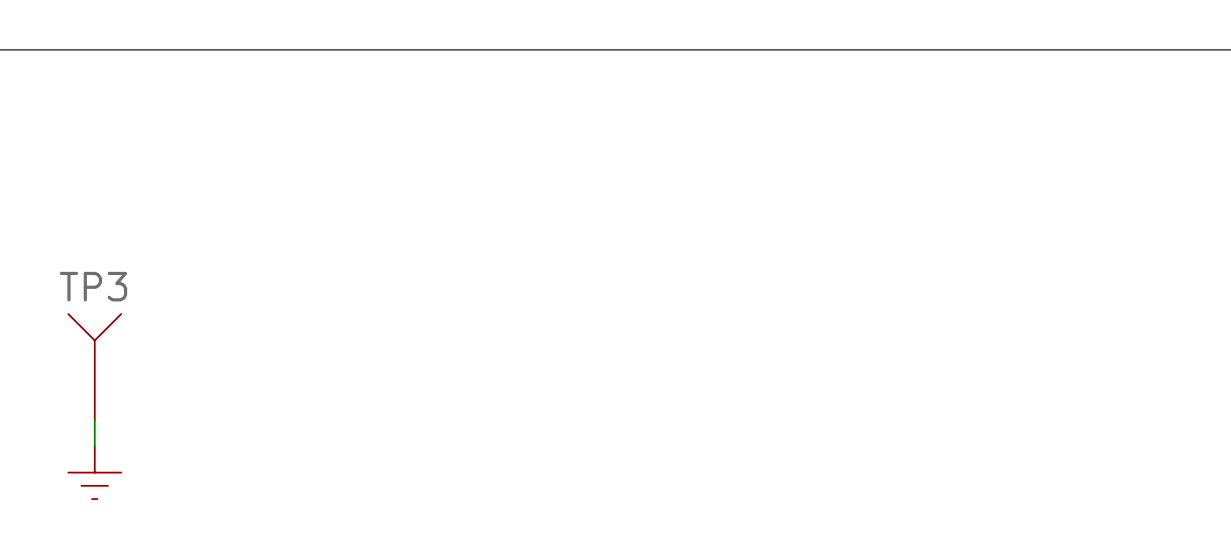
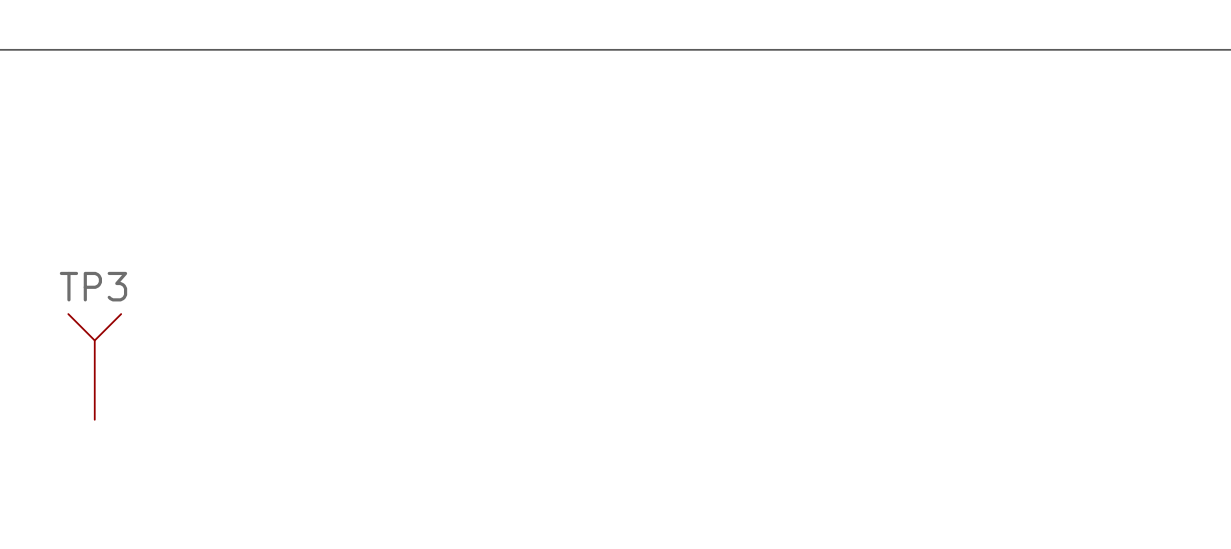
wire: (94, 419) (94, 446) -> none
power symbol: (94, 472) -> none

